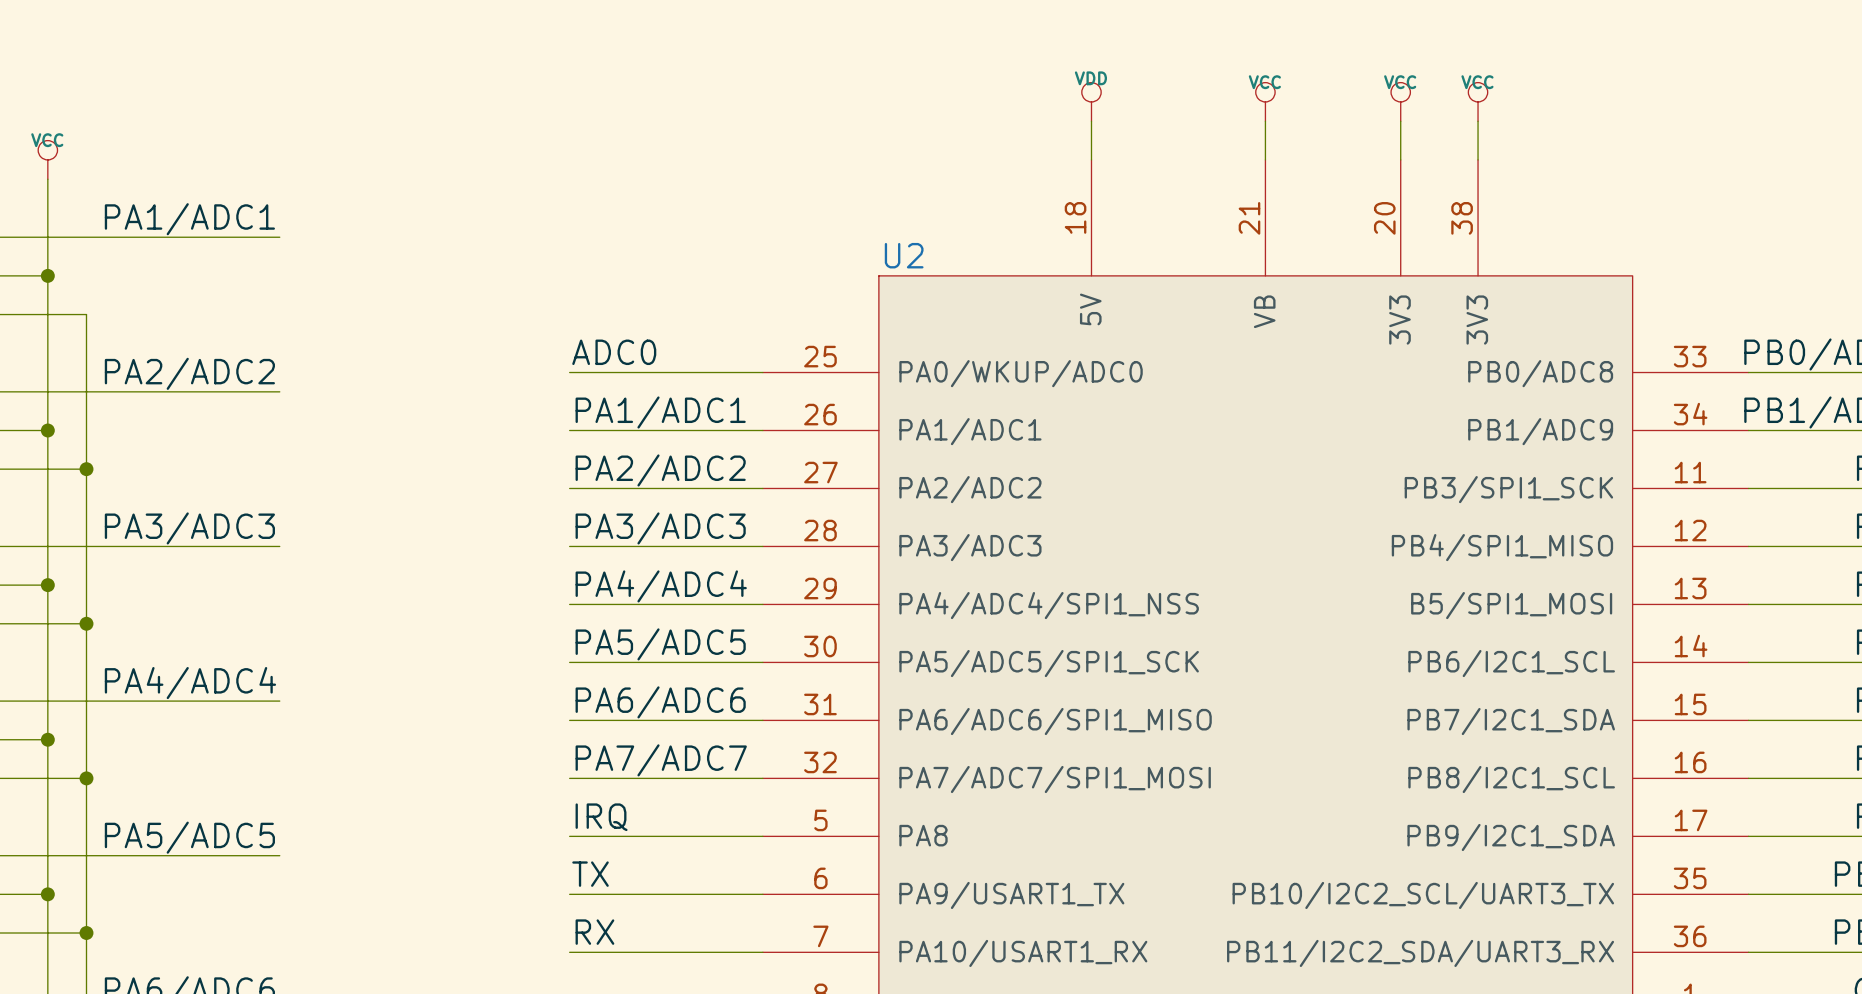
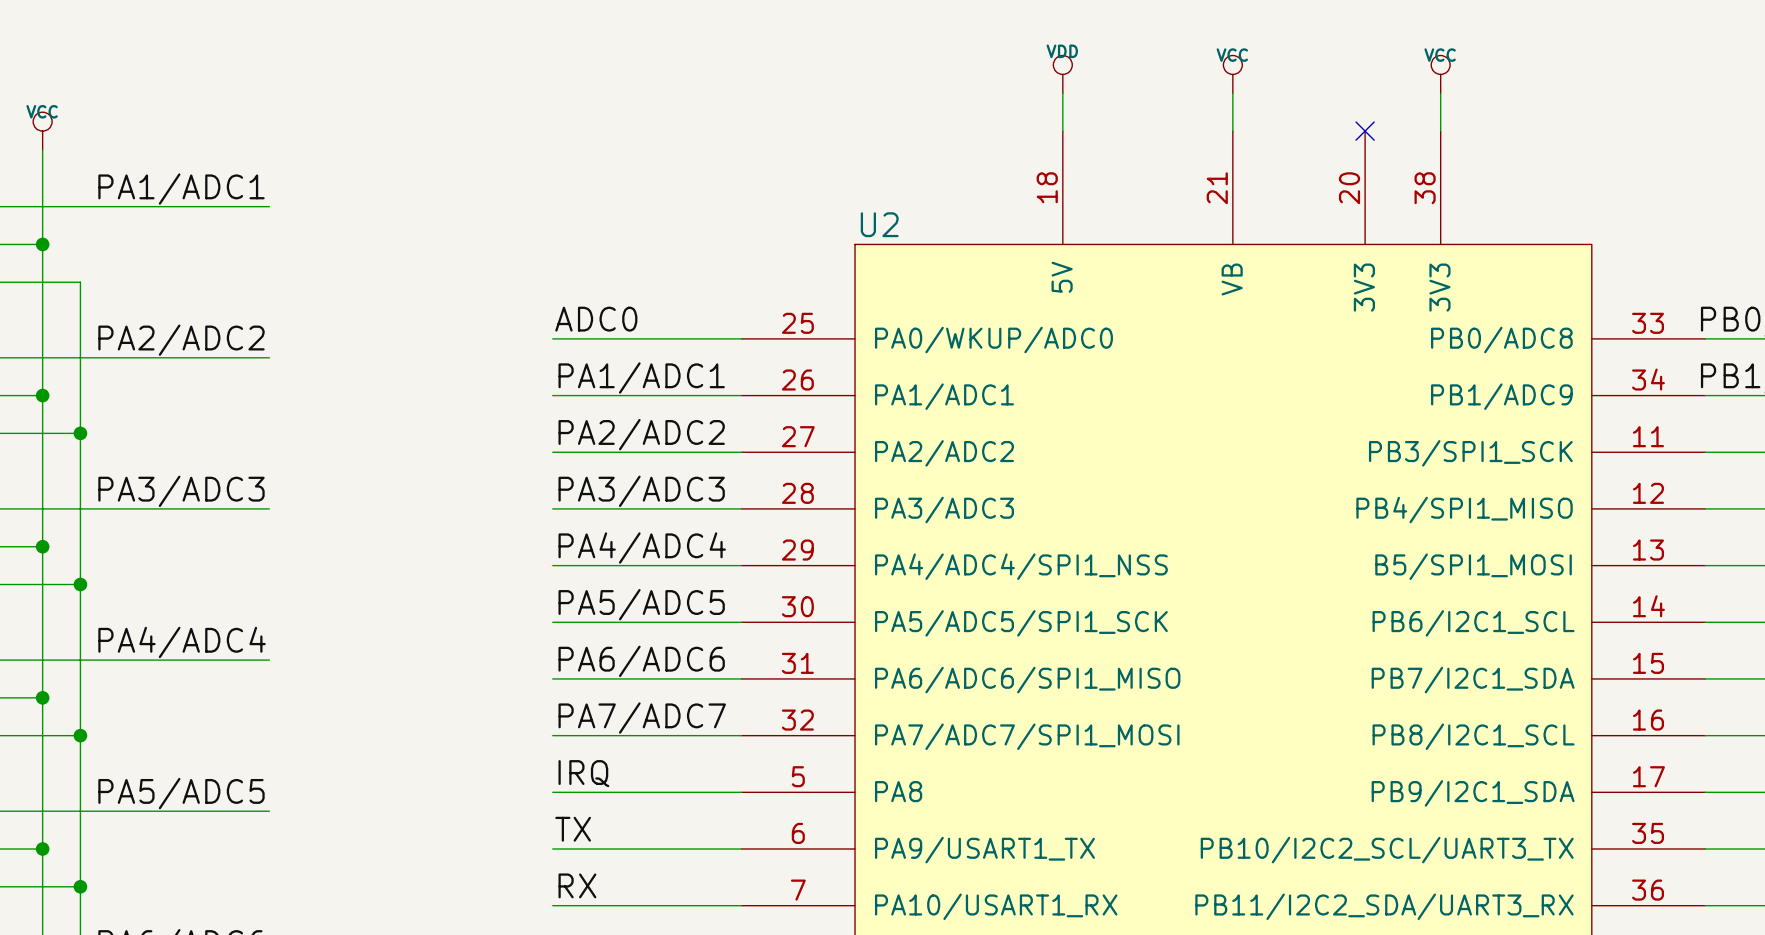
power symbol: VCC (1400, 101) -> none
wire: (1400, 121) (1400, 159) -> none
no-connect mark: none -> (1365, 131)

